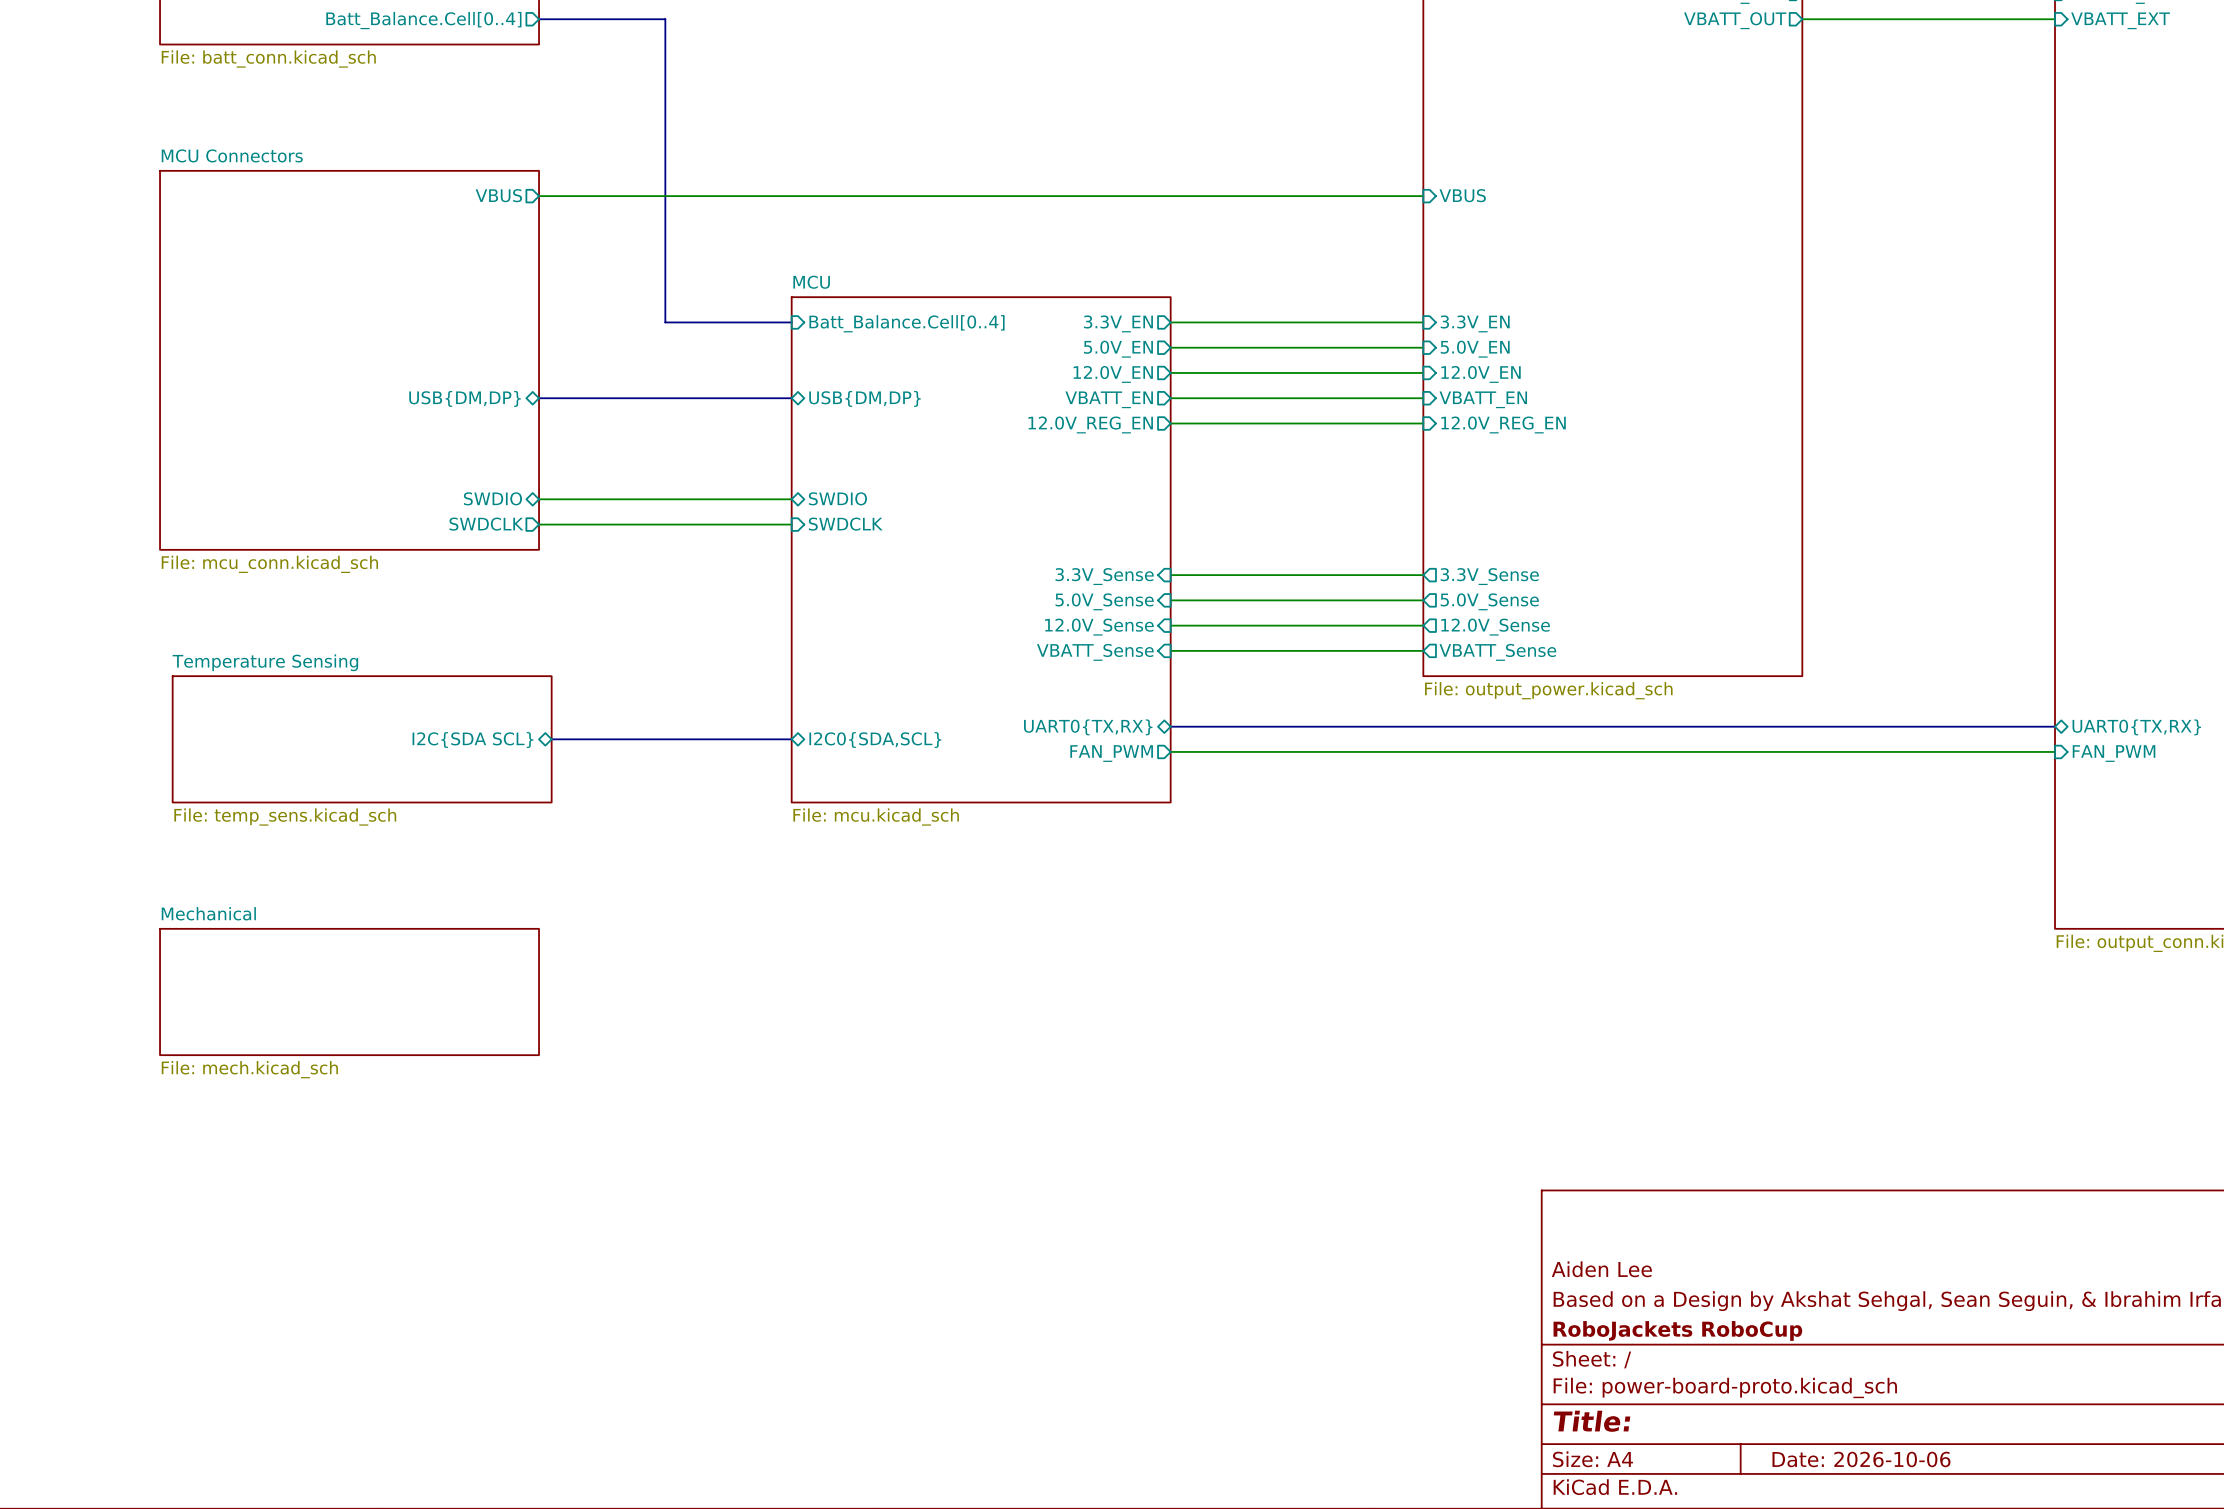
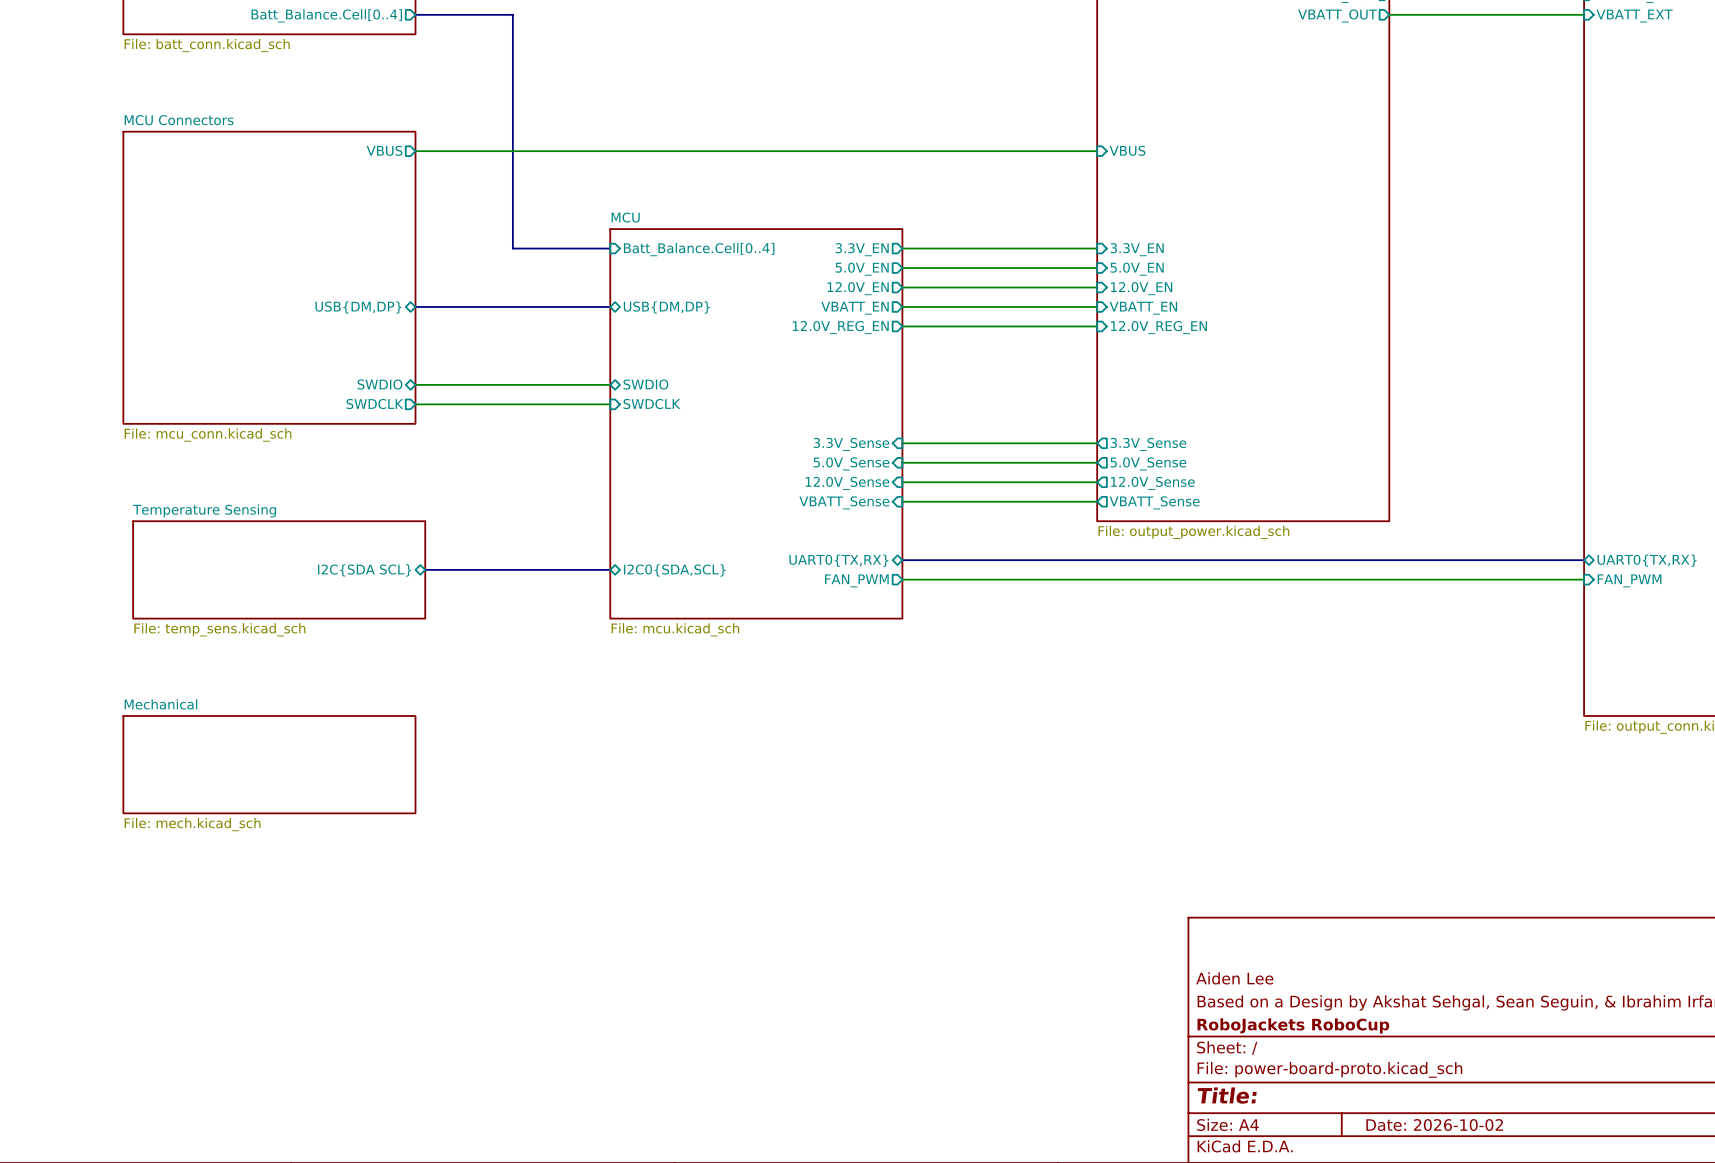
title block: Date: 2026-10-06 (1861, 1459) -> Date: 2026-10-02 (1434, 1125)

